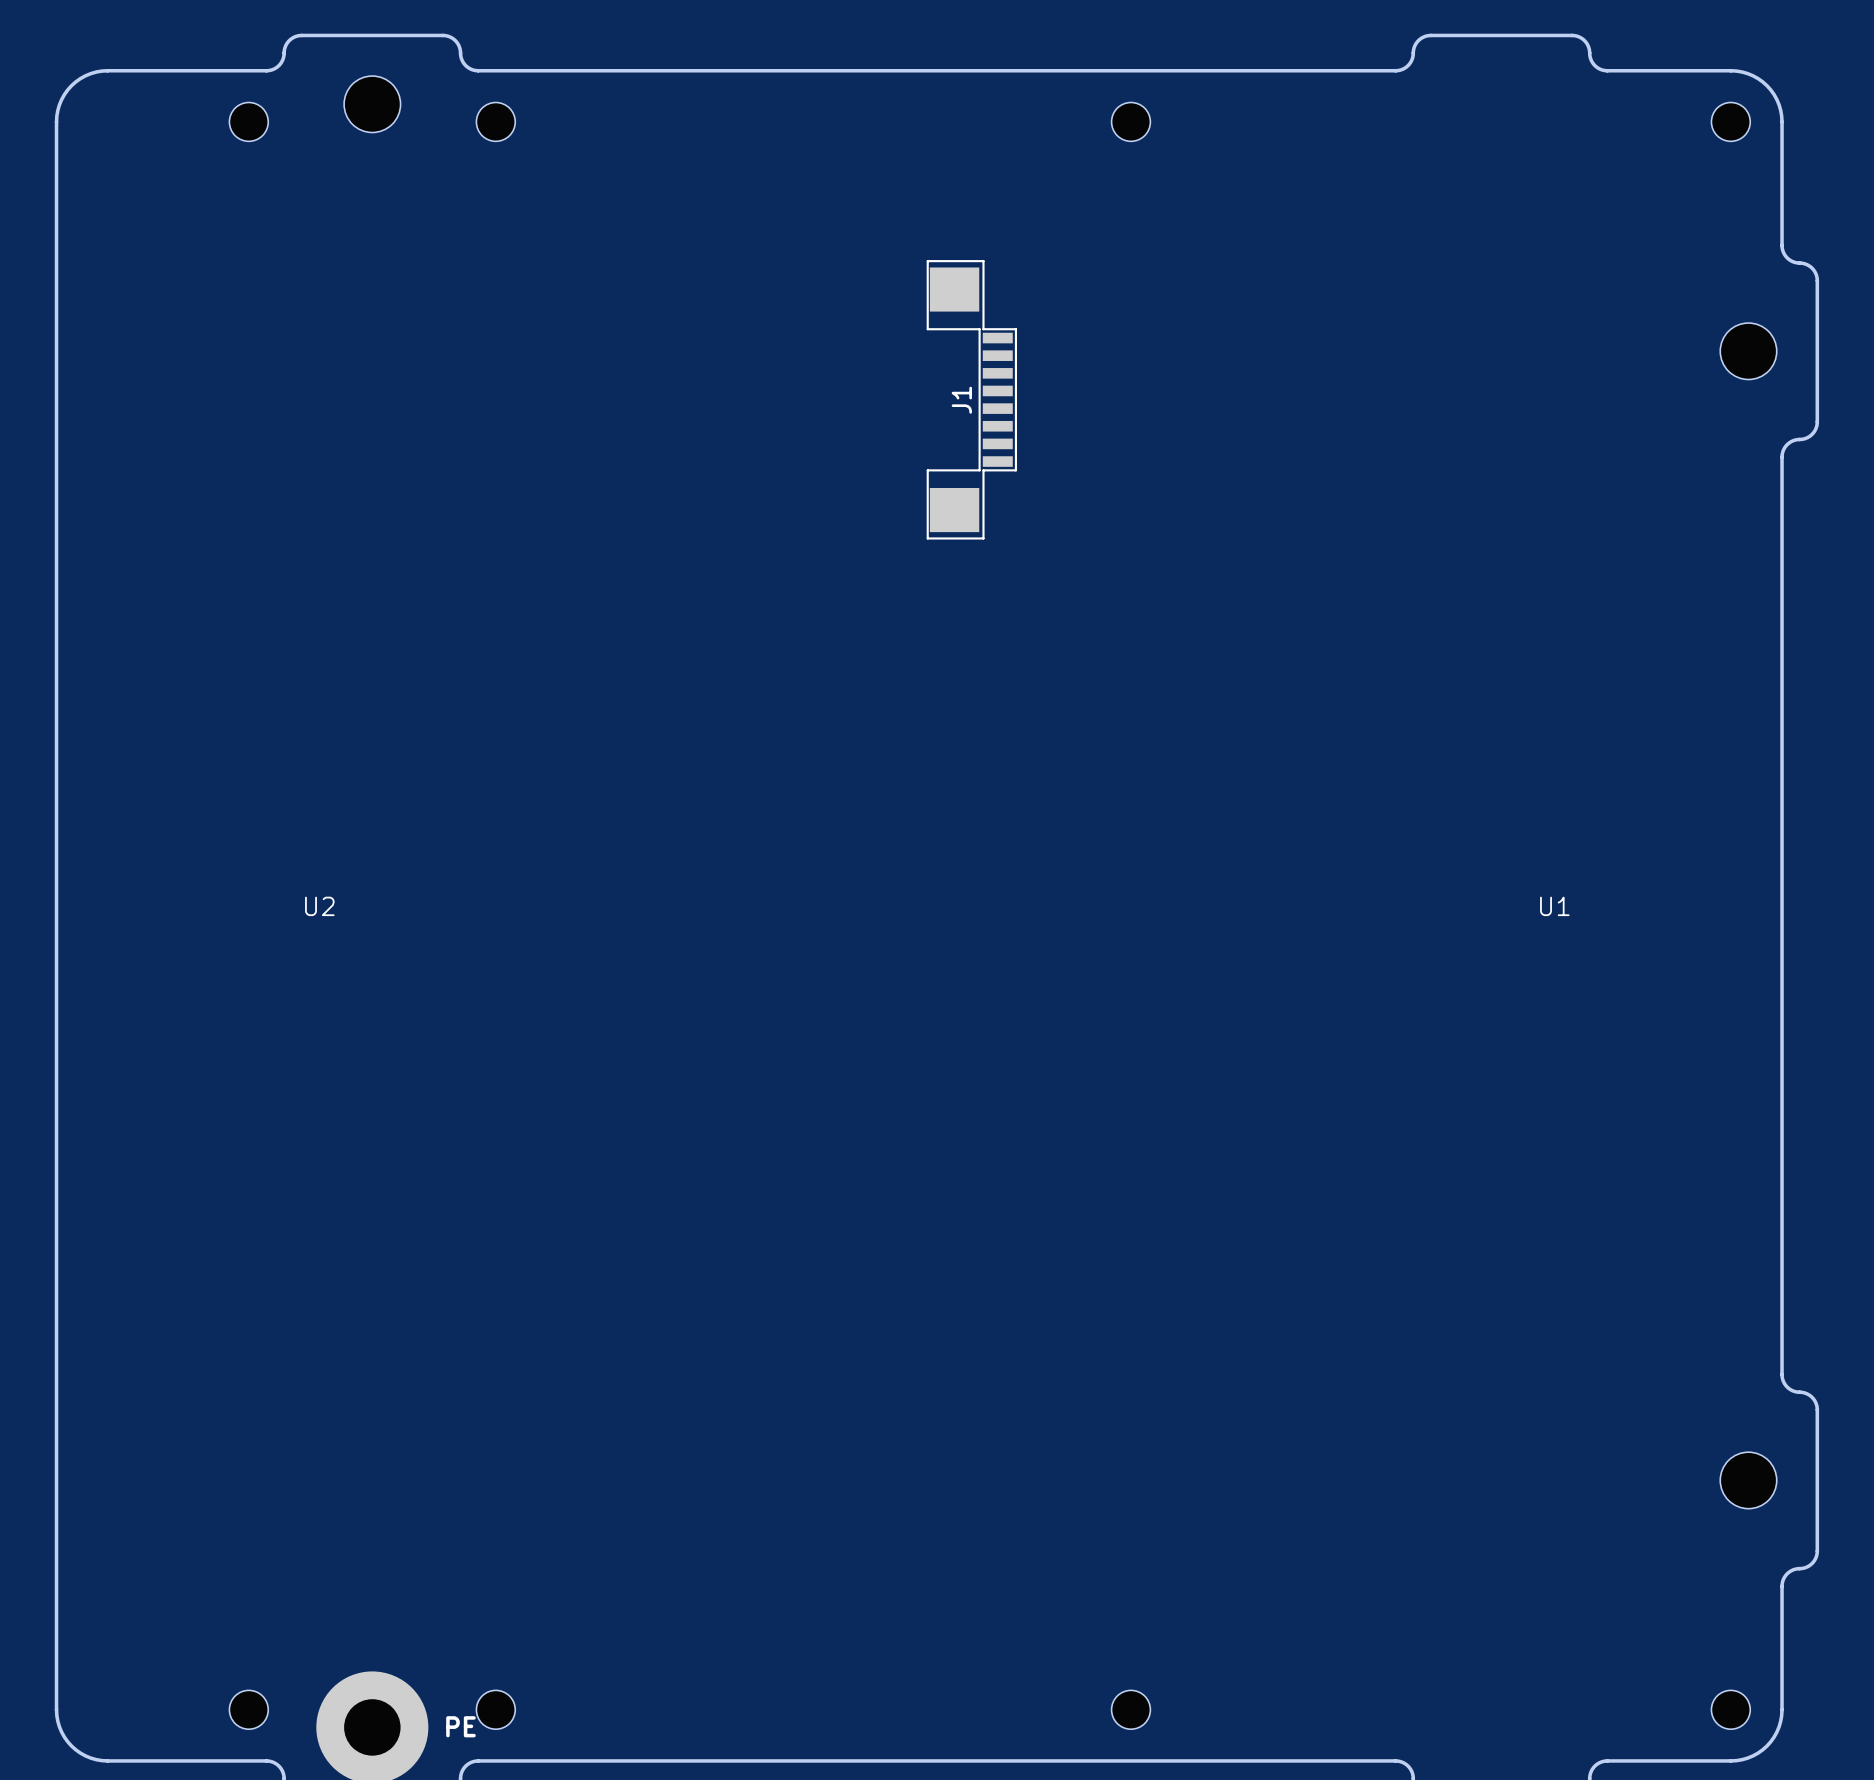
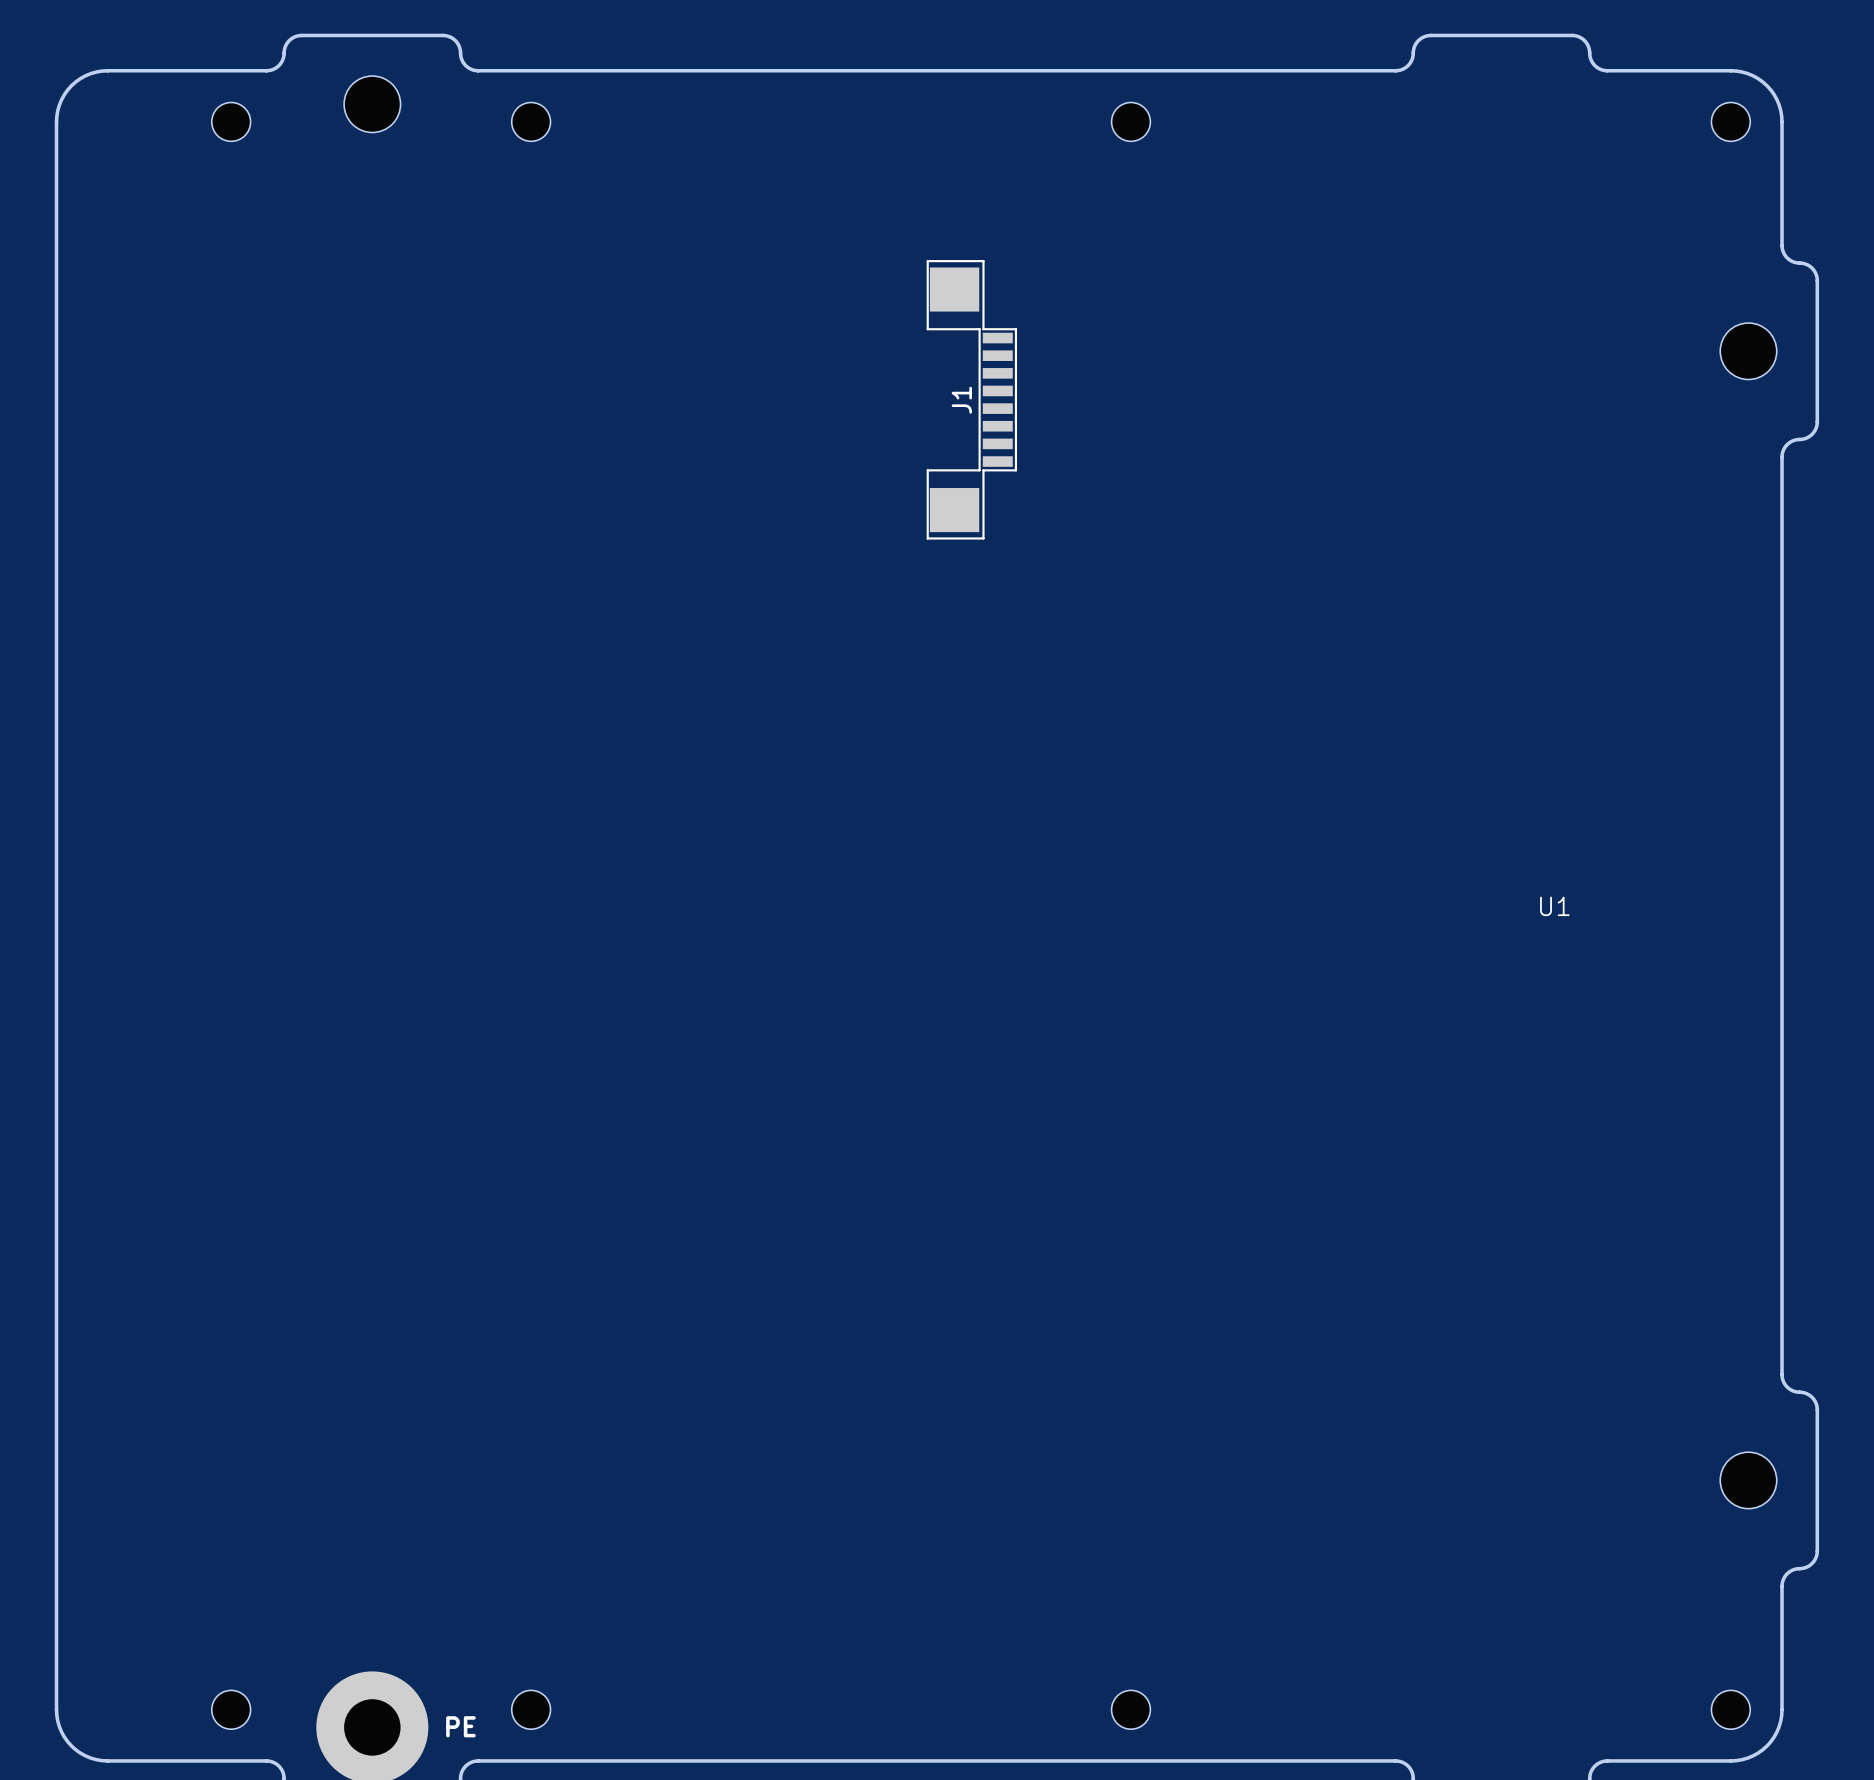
part: none -> (231, 121)
part: none -> (531, 121)
U2: (372, 915) -> none
part: none -> (231, 1709)
part: none -> (531, 1709)

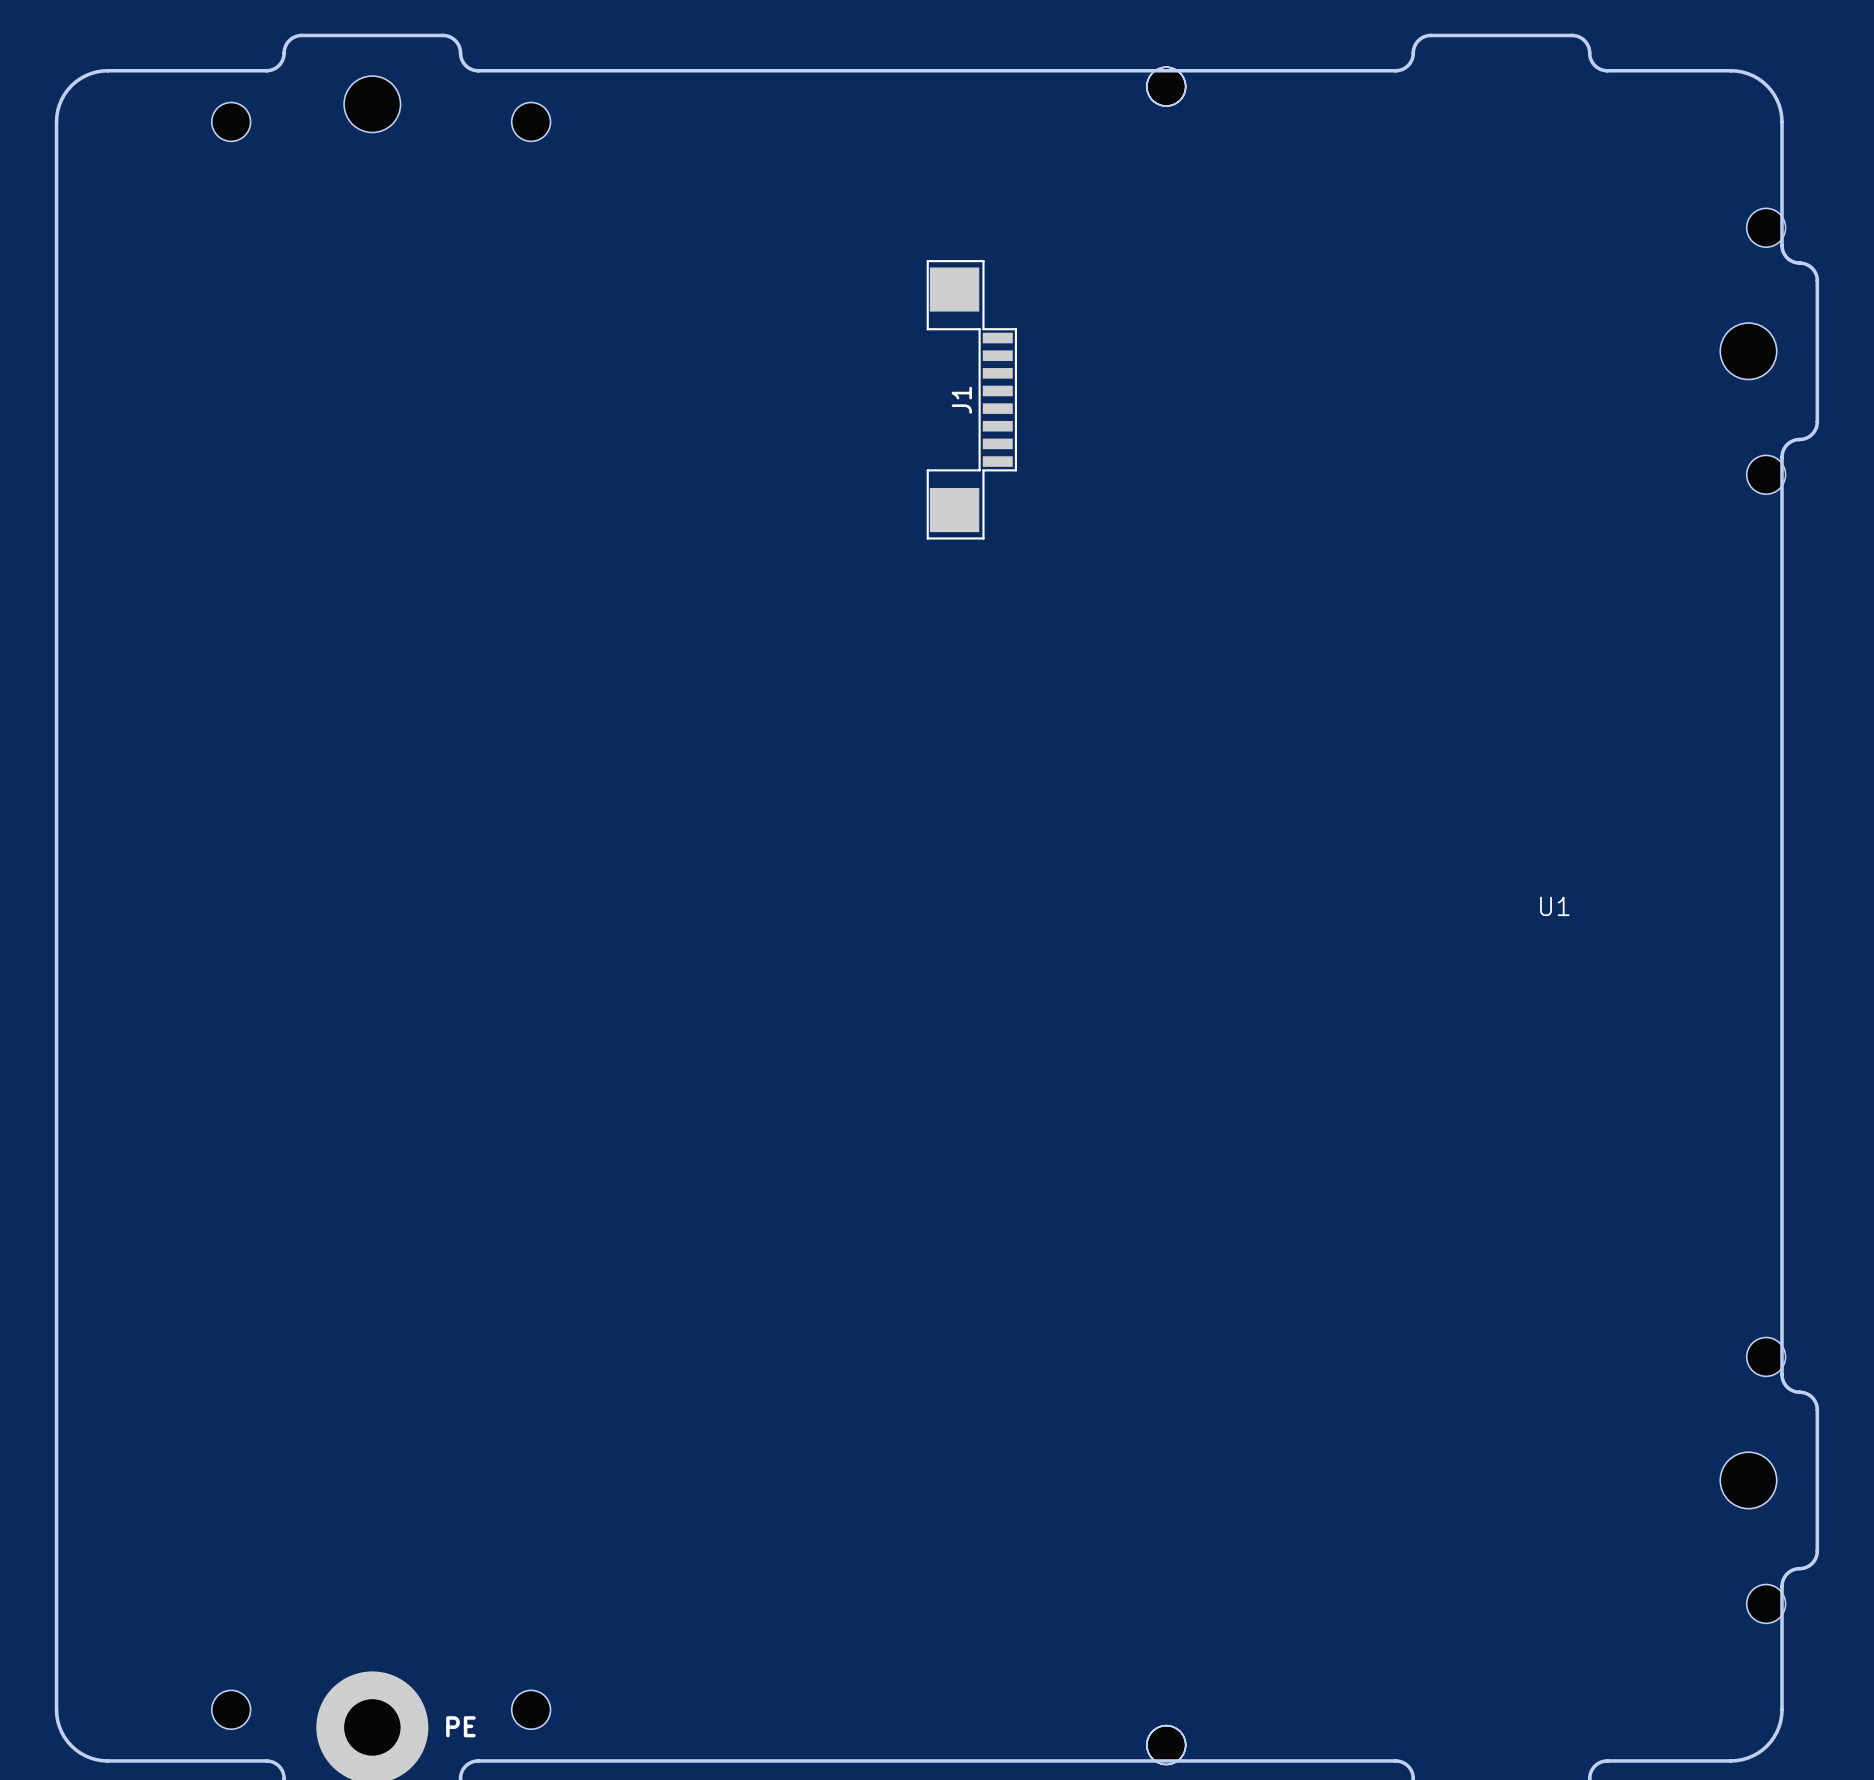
part: none -> (1166, 86)
U1 footprint: [1111, 102, 1751, 1730] -> [1146, 67, 1786, 1765]
part: none -> (1766, 227)
part: none -> (1766, 1603)
part: none -> (1166, 1745)

